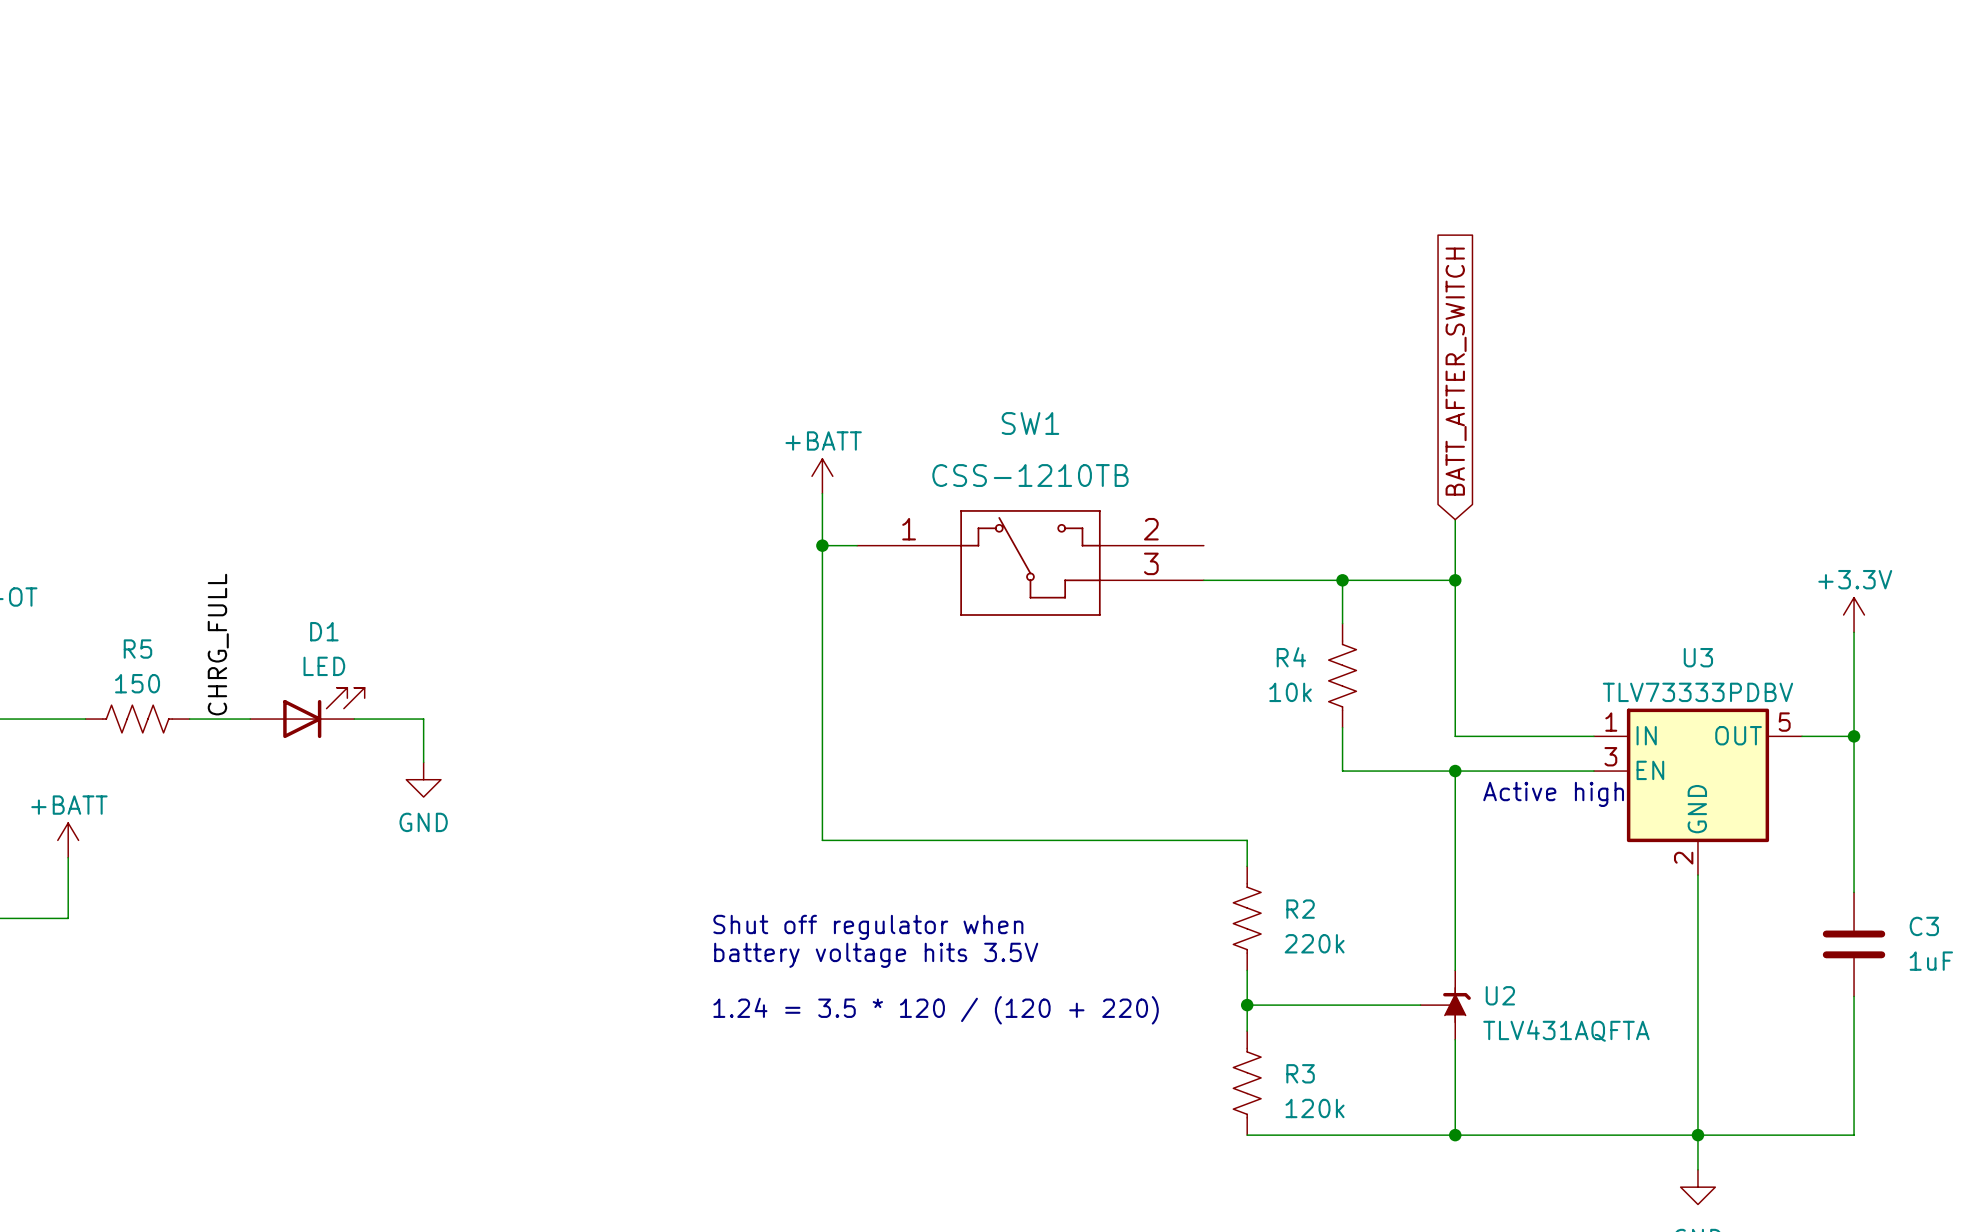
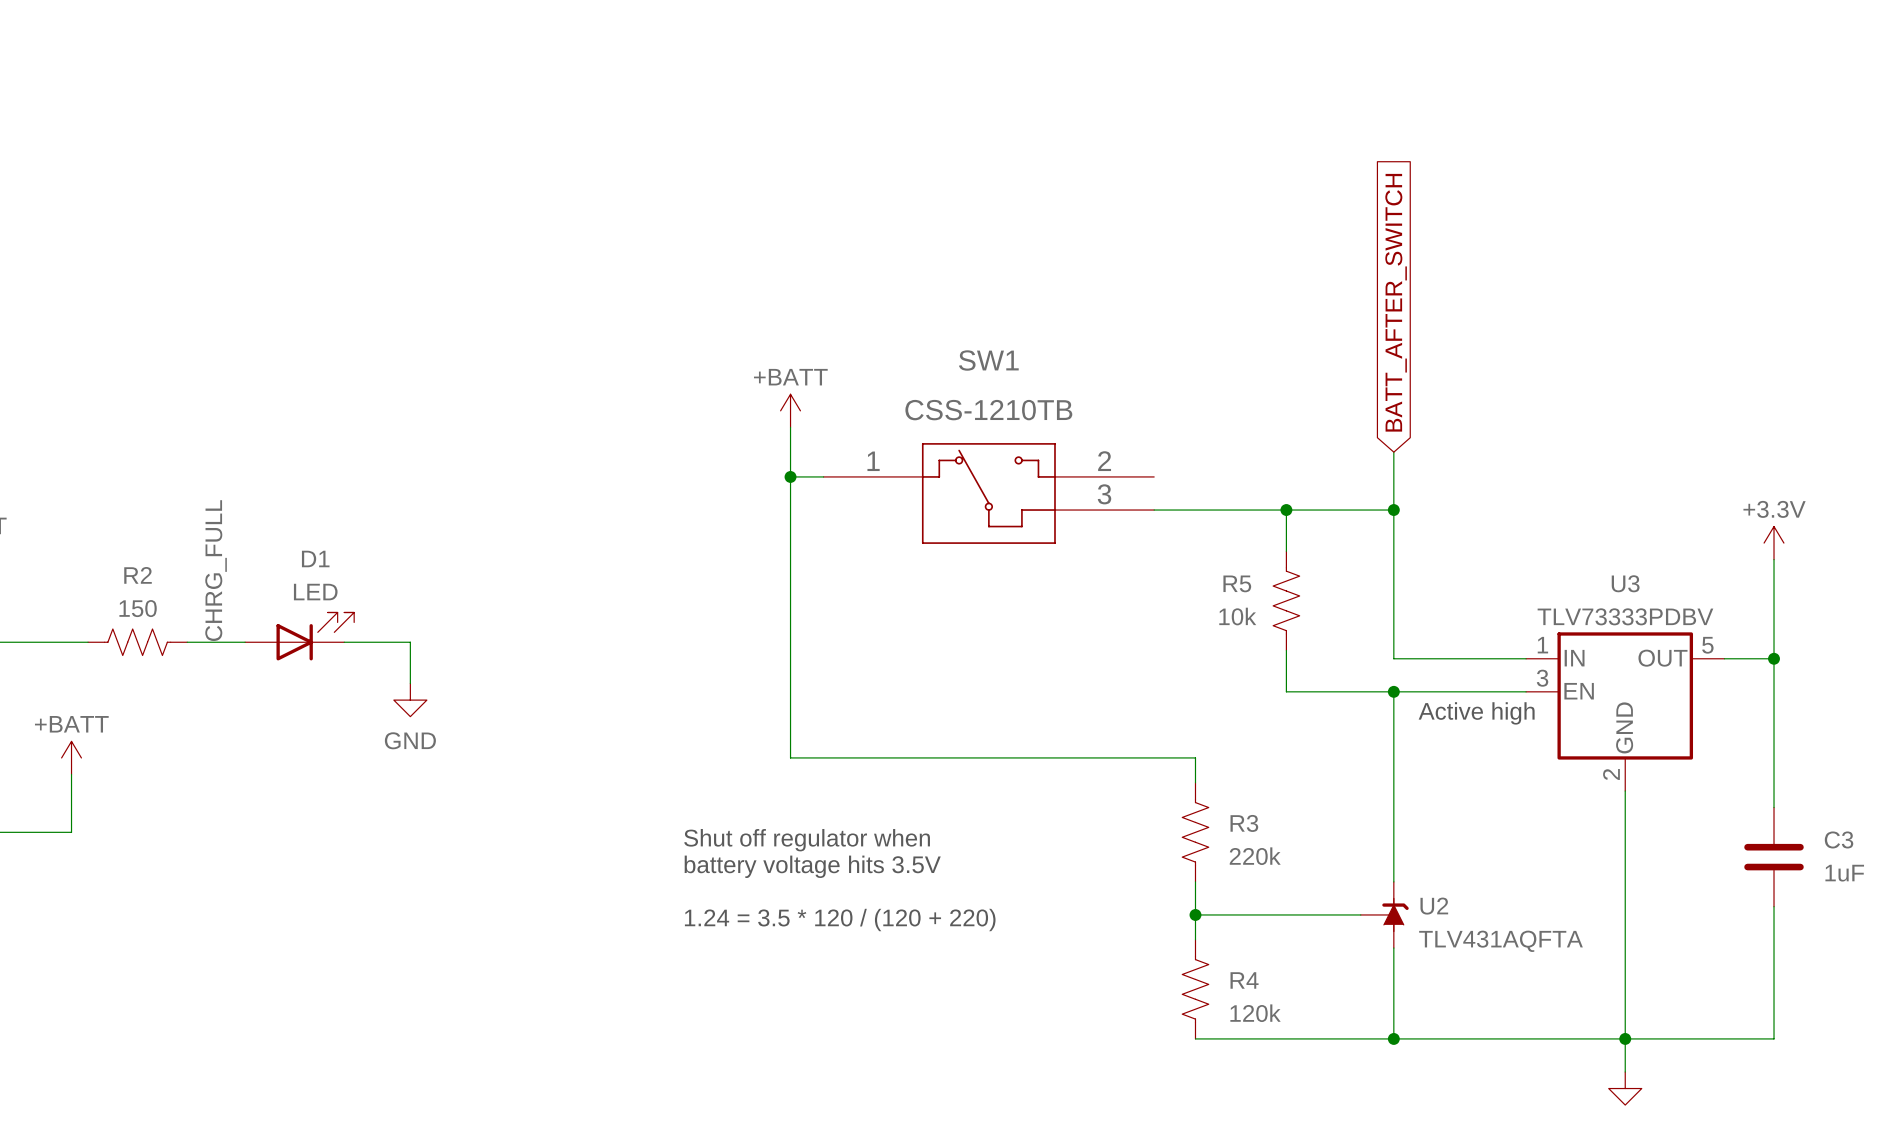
R5 name: R5 (137, 649) -> R2 (138, 575)
R4 name: R4 (1291, 657) -> R5 (1237, 583)
R2 name: R2 (1300, 909) -> R3 (1244, 823)
R3 name: R3 (1300, 1073) -> R4 (1244, 980)

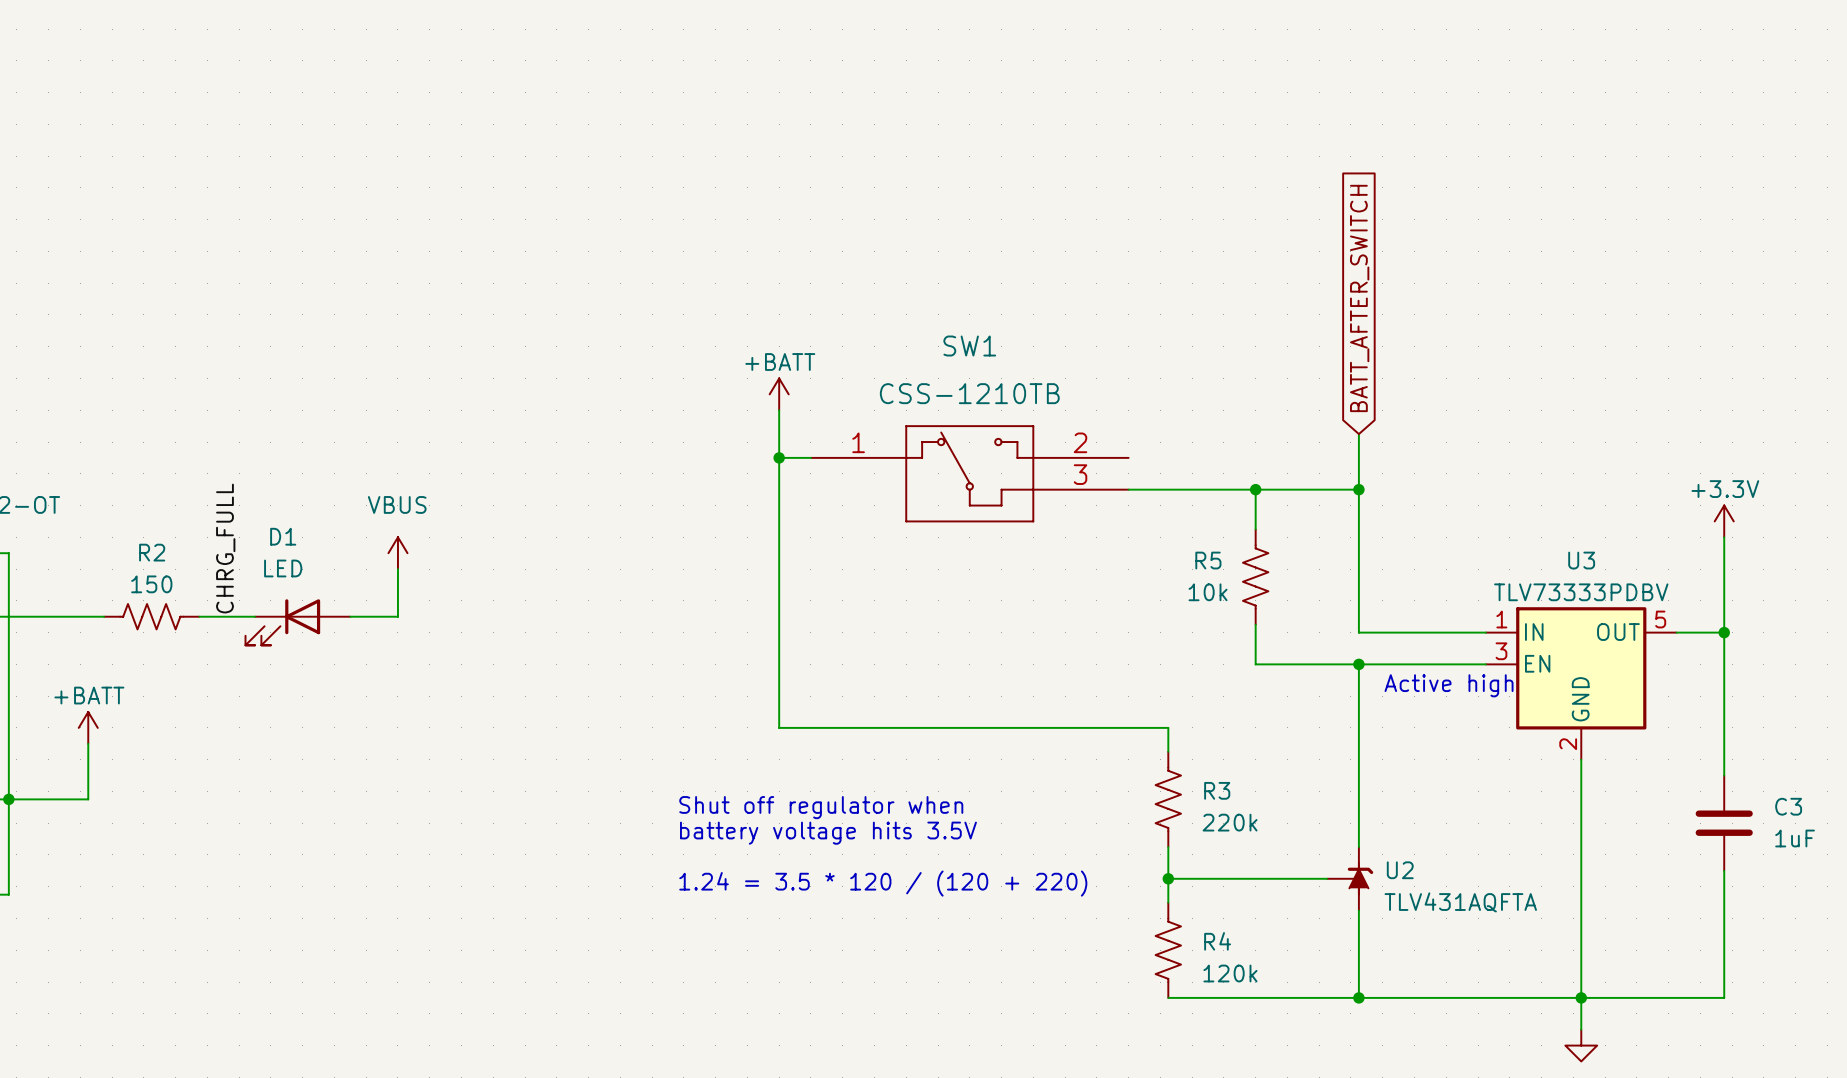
D1 name position: D1 (315, 558) -> D1 (283, 536)
power symbol: none -> VBUS (397, 553)
D1 value position: LED (315, 592) -> LED (283, 568)
D1 rotation: 0° (315, 636) -> 180° (282, 622)
wire: (393, 642) (410, 642) (410, 683) -> (397, 616) (397, 569)
power symbol: GND (410, 700) -> none

